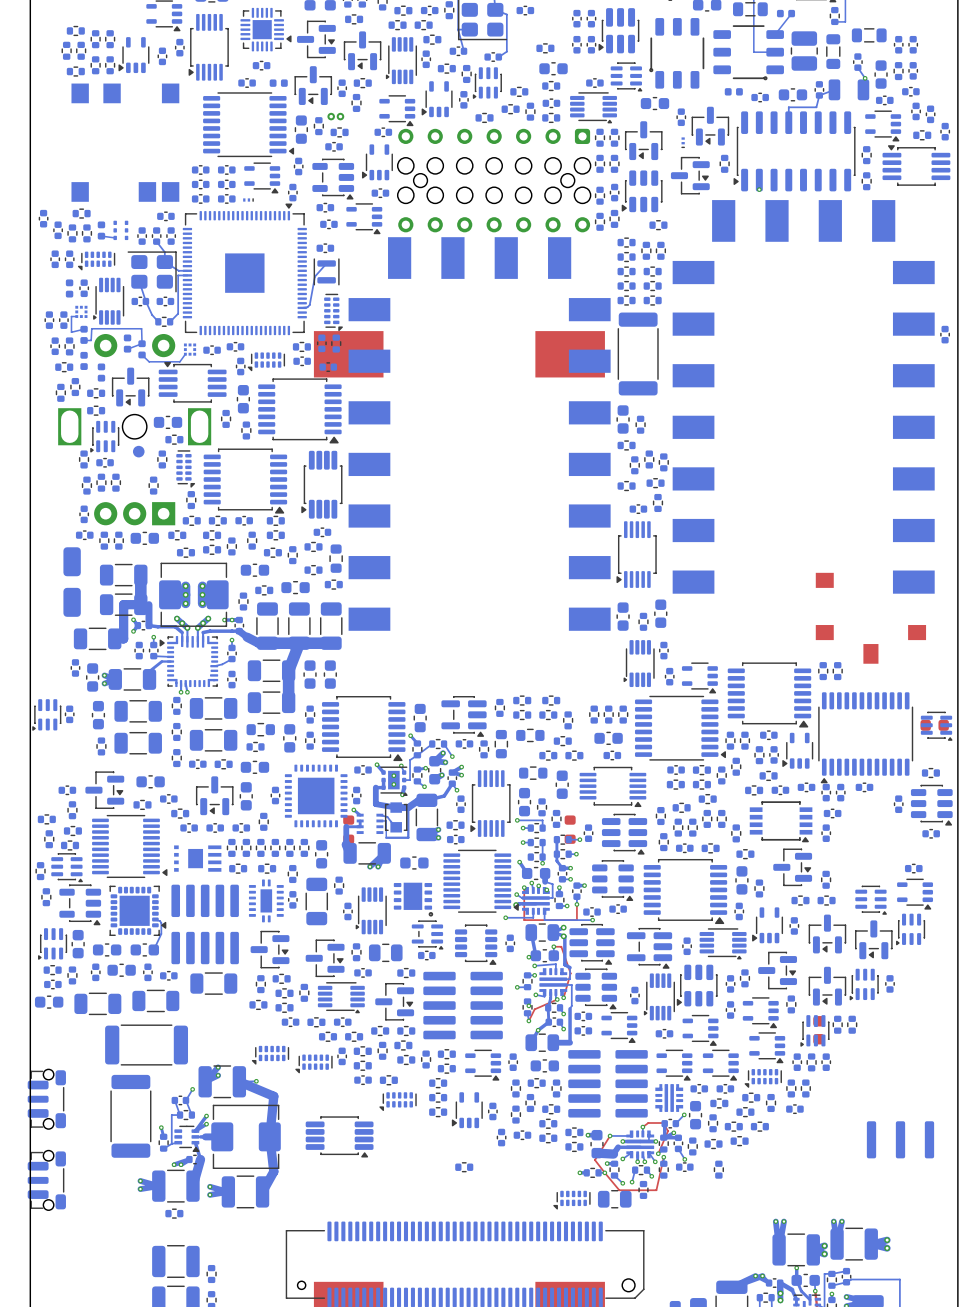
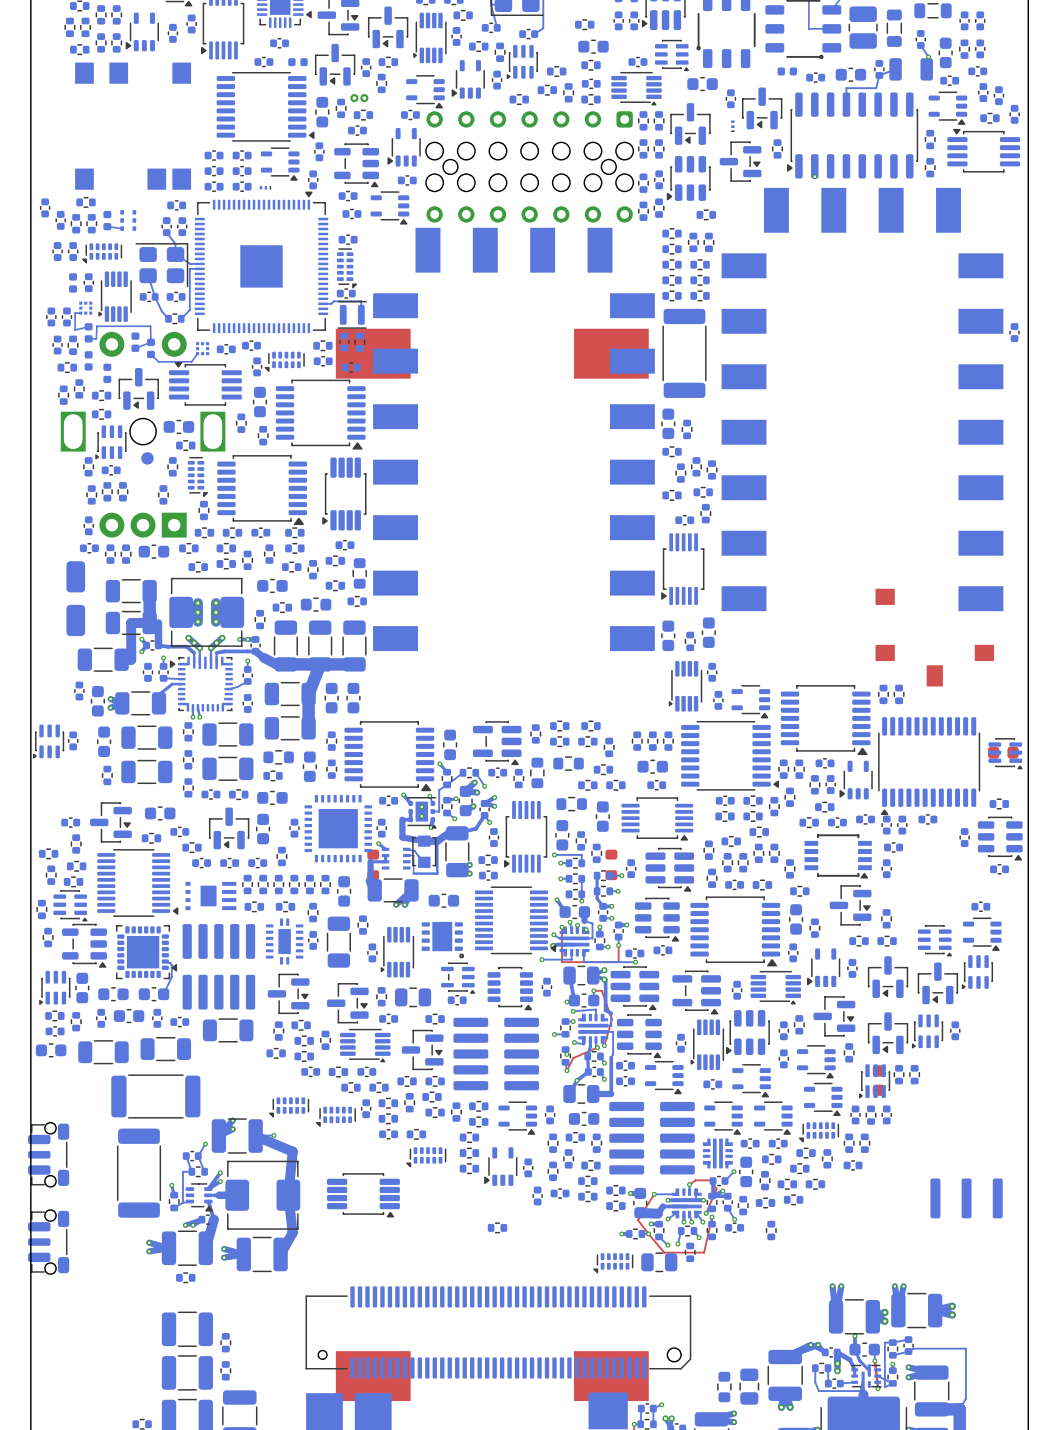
part rotation: 0° (142, 236) -> 90° clockwise (346, 293)
part position: (142, 236) -> (346, 293)
part footprint: [313, 258, 340, 286] -> [336, 248, 358, 289]
bottom track: (326, 263) (314, 276) (309, 305) (302, 307) -> (361, 314) (361, 301) (333, 301) (331, 303) (323, 303)
part footprint: [324, 293, 343, 332] -> [337, 300, 367, 329]

